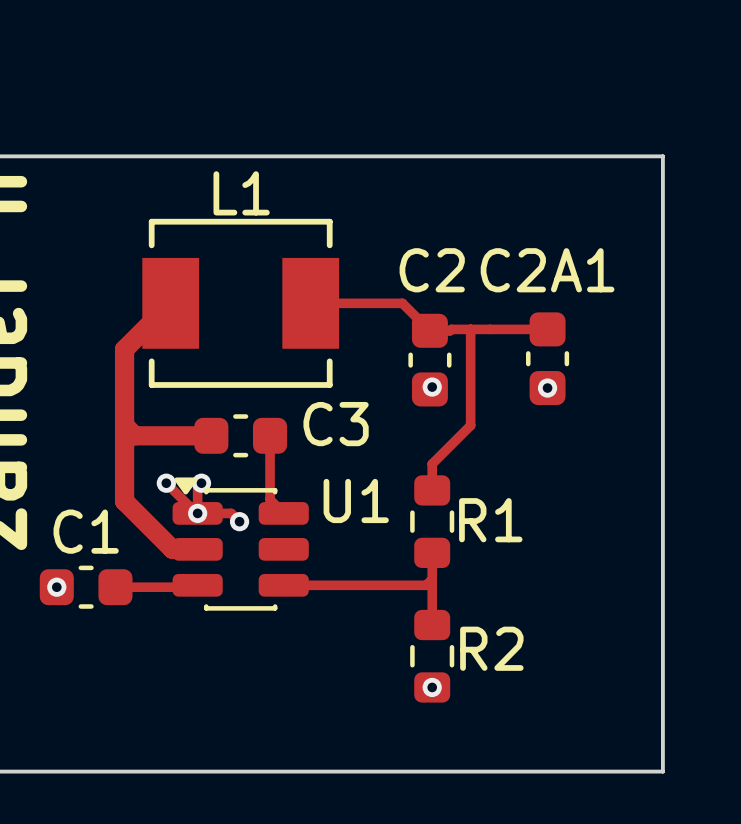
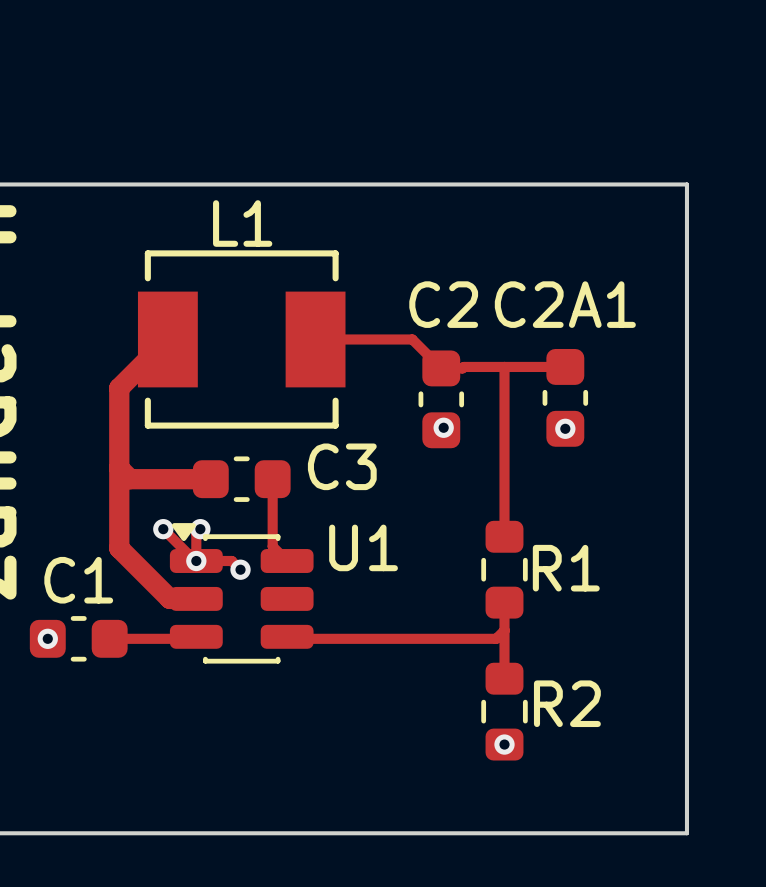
top track: (470, 329) (470, 425) (432, 463) (432, 490) -> none
top track: none -> (504, 366) (504, 536)
R1 position: (432, 521) -> (504, 569)
top track: (432, 552) (432, 625) -> (504, 602) (504, 678)
top track: (432, 579) (426, 585) (283, 585) -> none
top track: none -> (504, 630) (496, 638) (289, 638)
R2 position: (432, 656) -> (504, 711)
via position: (432, 687) -> (504, 744)

